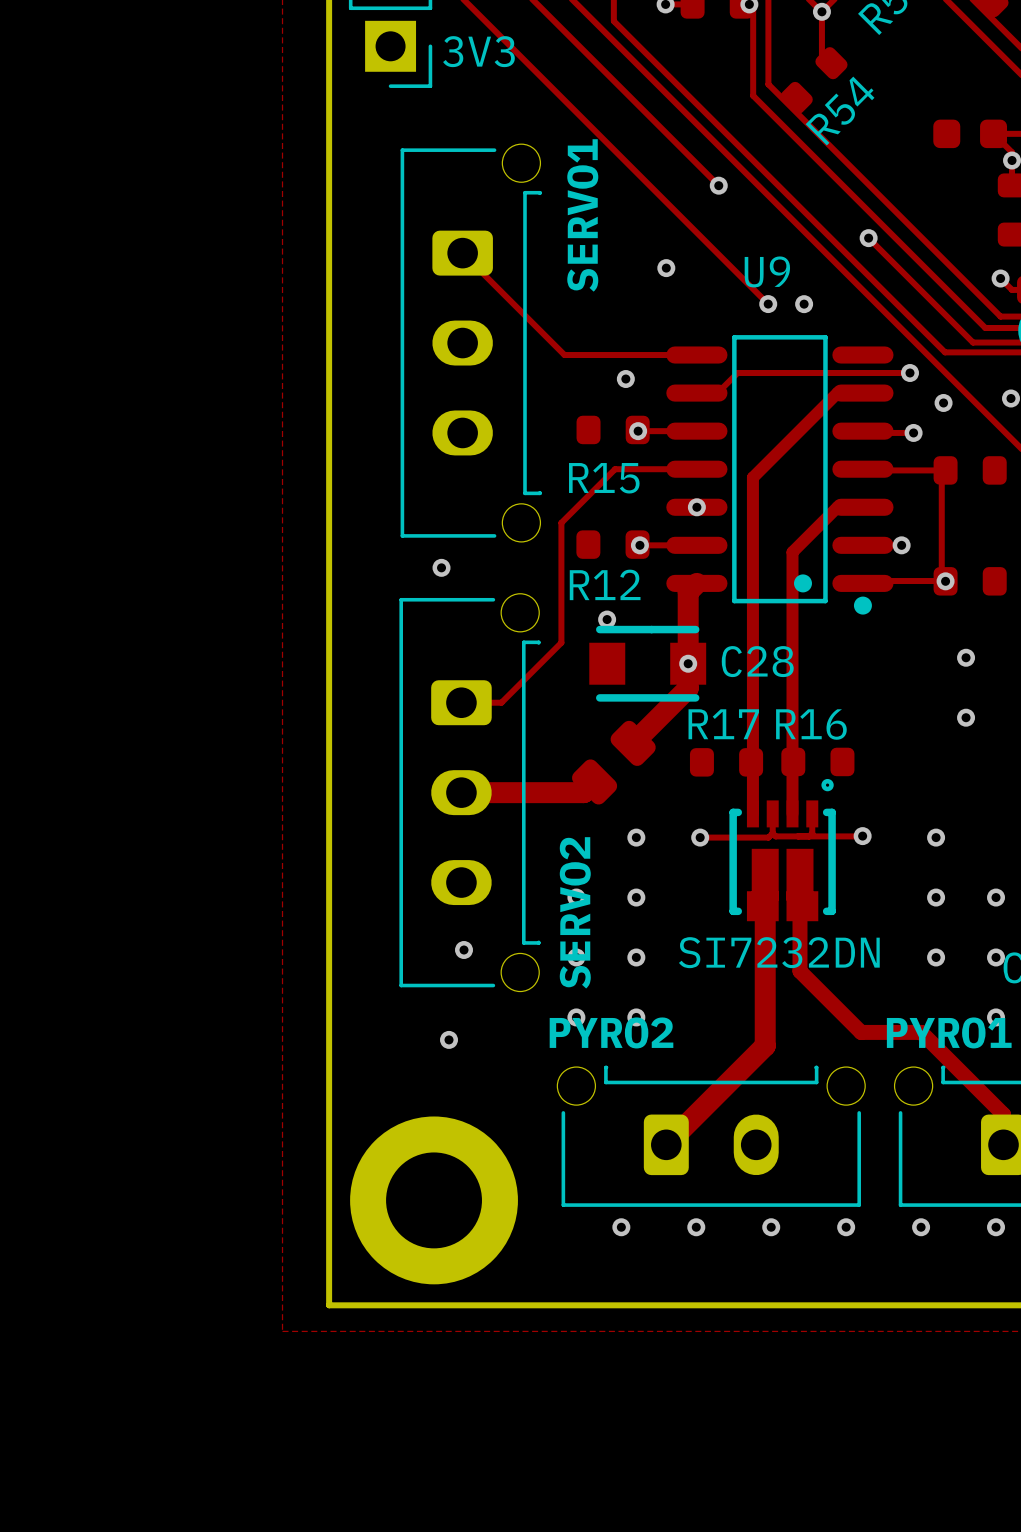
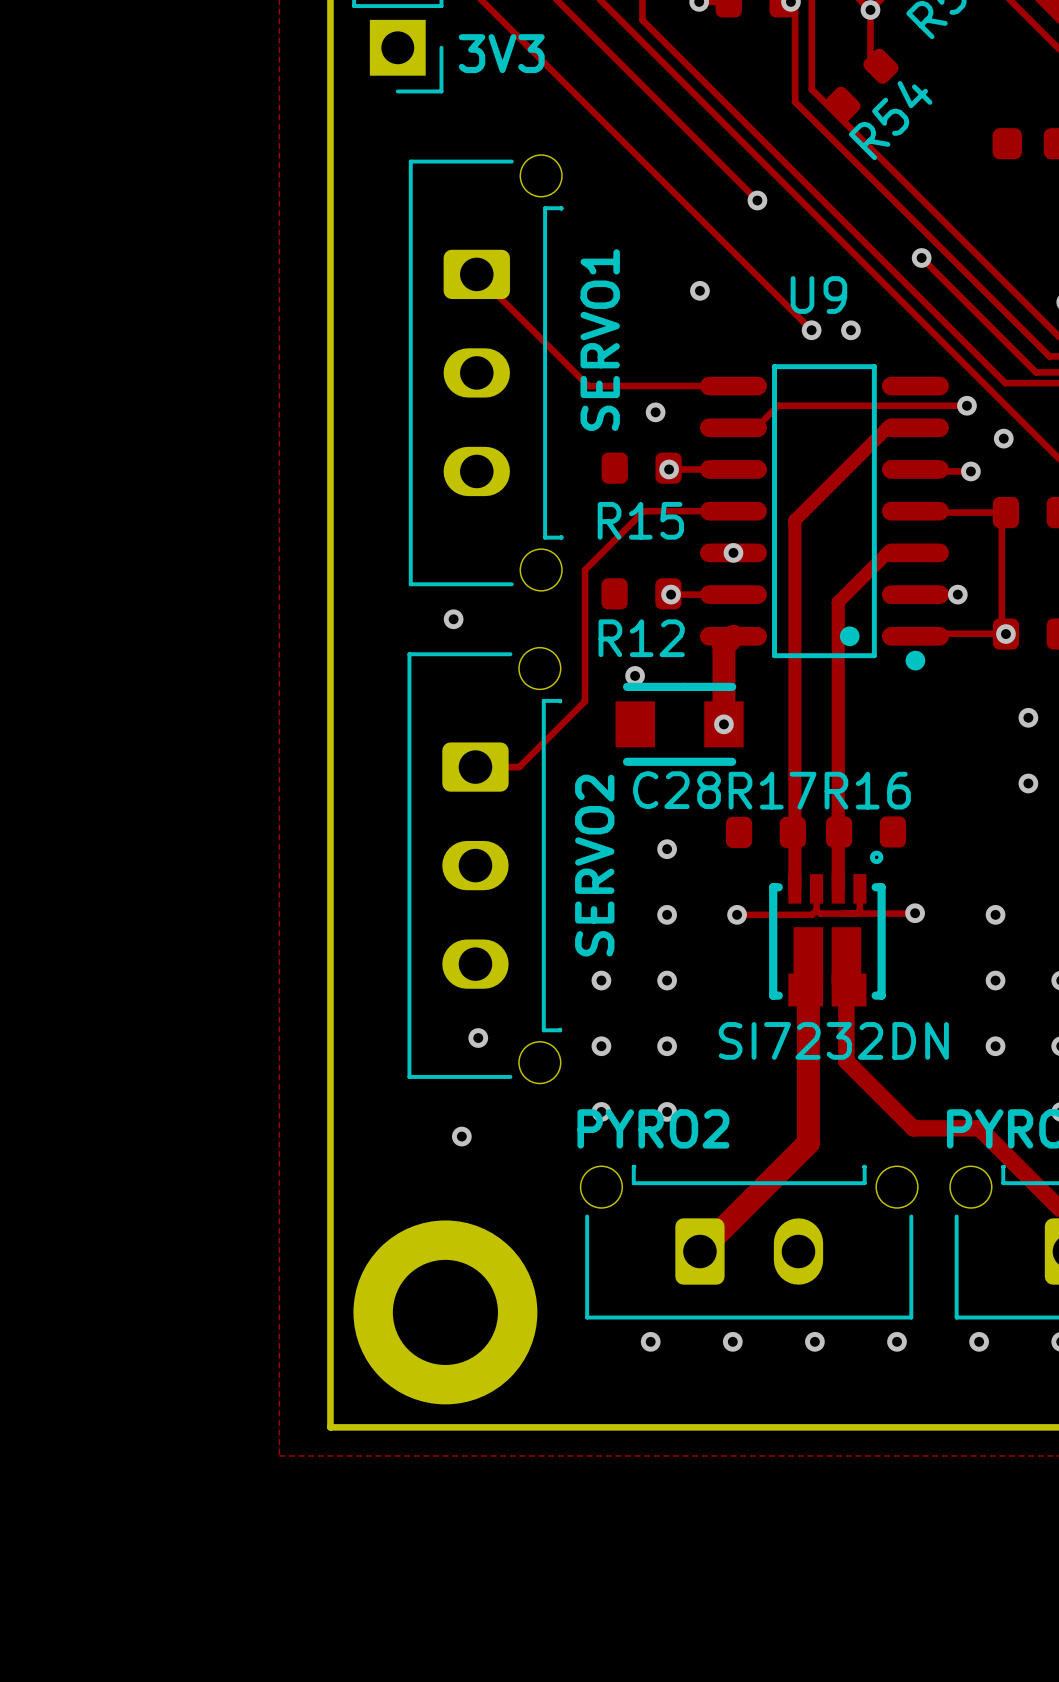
SERVO1 name position: SERVO1 (582, 215) -> SERVO1 (600, 340)
text position: C28 (757, 661) -> C28 (677, 790)
track: (688, 663) (688, 688) (633, 743) -> none
part: (613, 762) -> none
via: none -> (667, 849)
track: (594, 781) (583, 792) (461, 792) -> none
SERVO2 name position: SERVO2 (575, 912) -> SERVO2 (594, 865)

